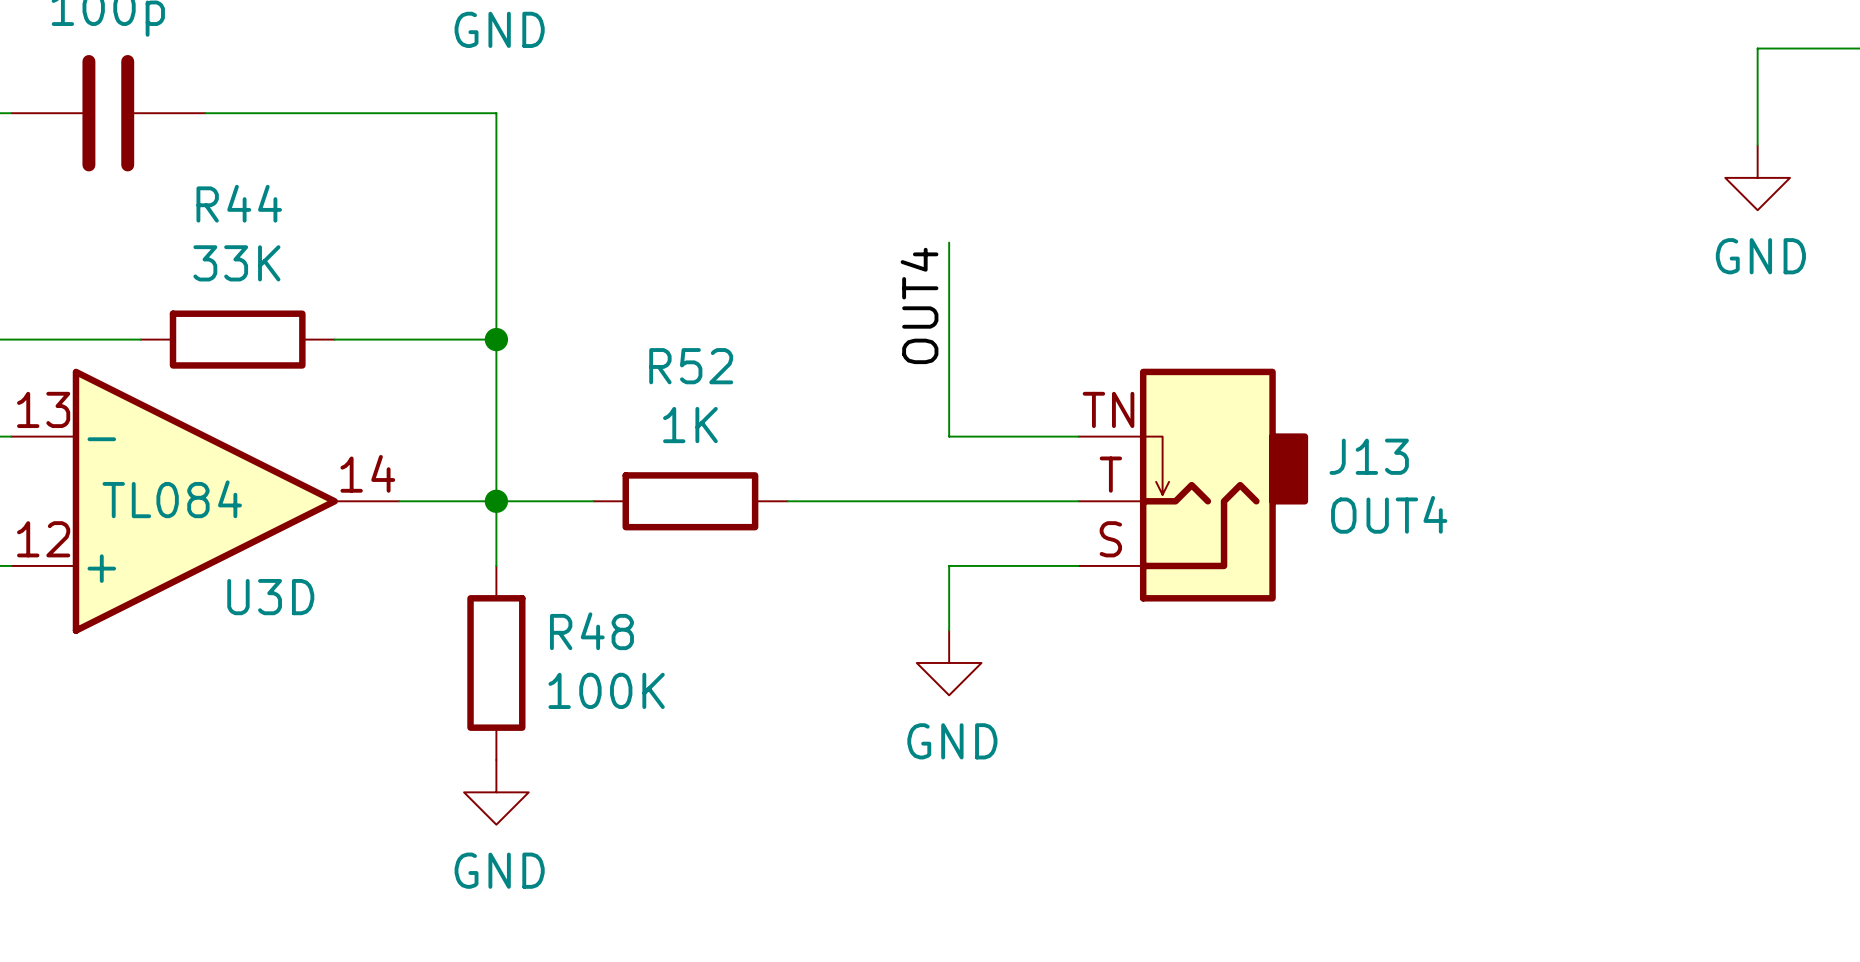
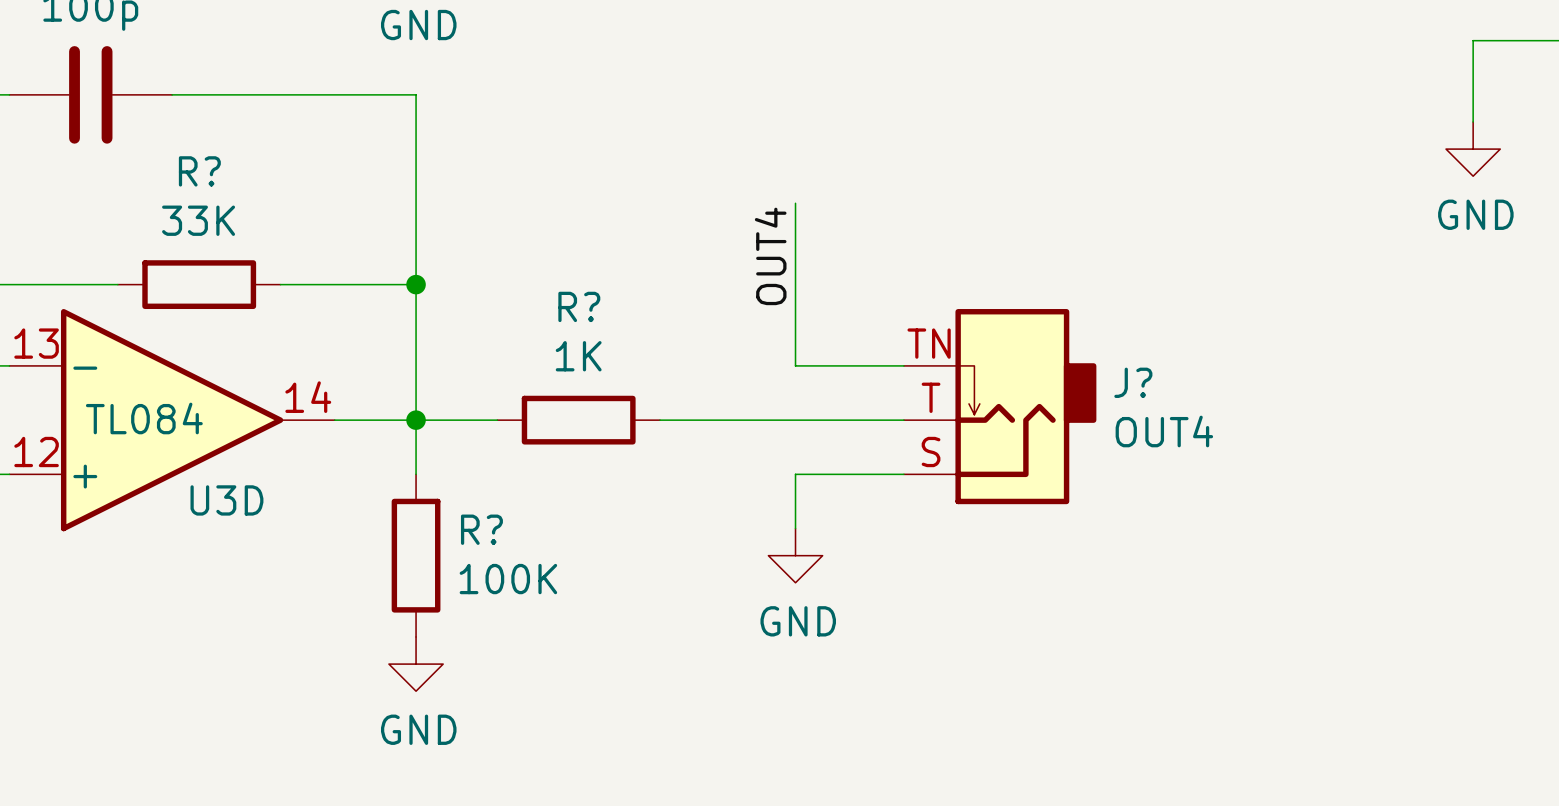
R44 name: R44 (239, 203) -> R? (199, 171)
R52 name: R52 (691, 366) -> R? (579, 306)
J13 name: J13 (1369, 456) -> J? (1133, 382)
R48 name: R48 (591, 631) -> R? (481, 529)

